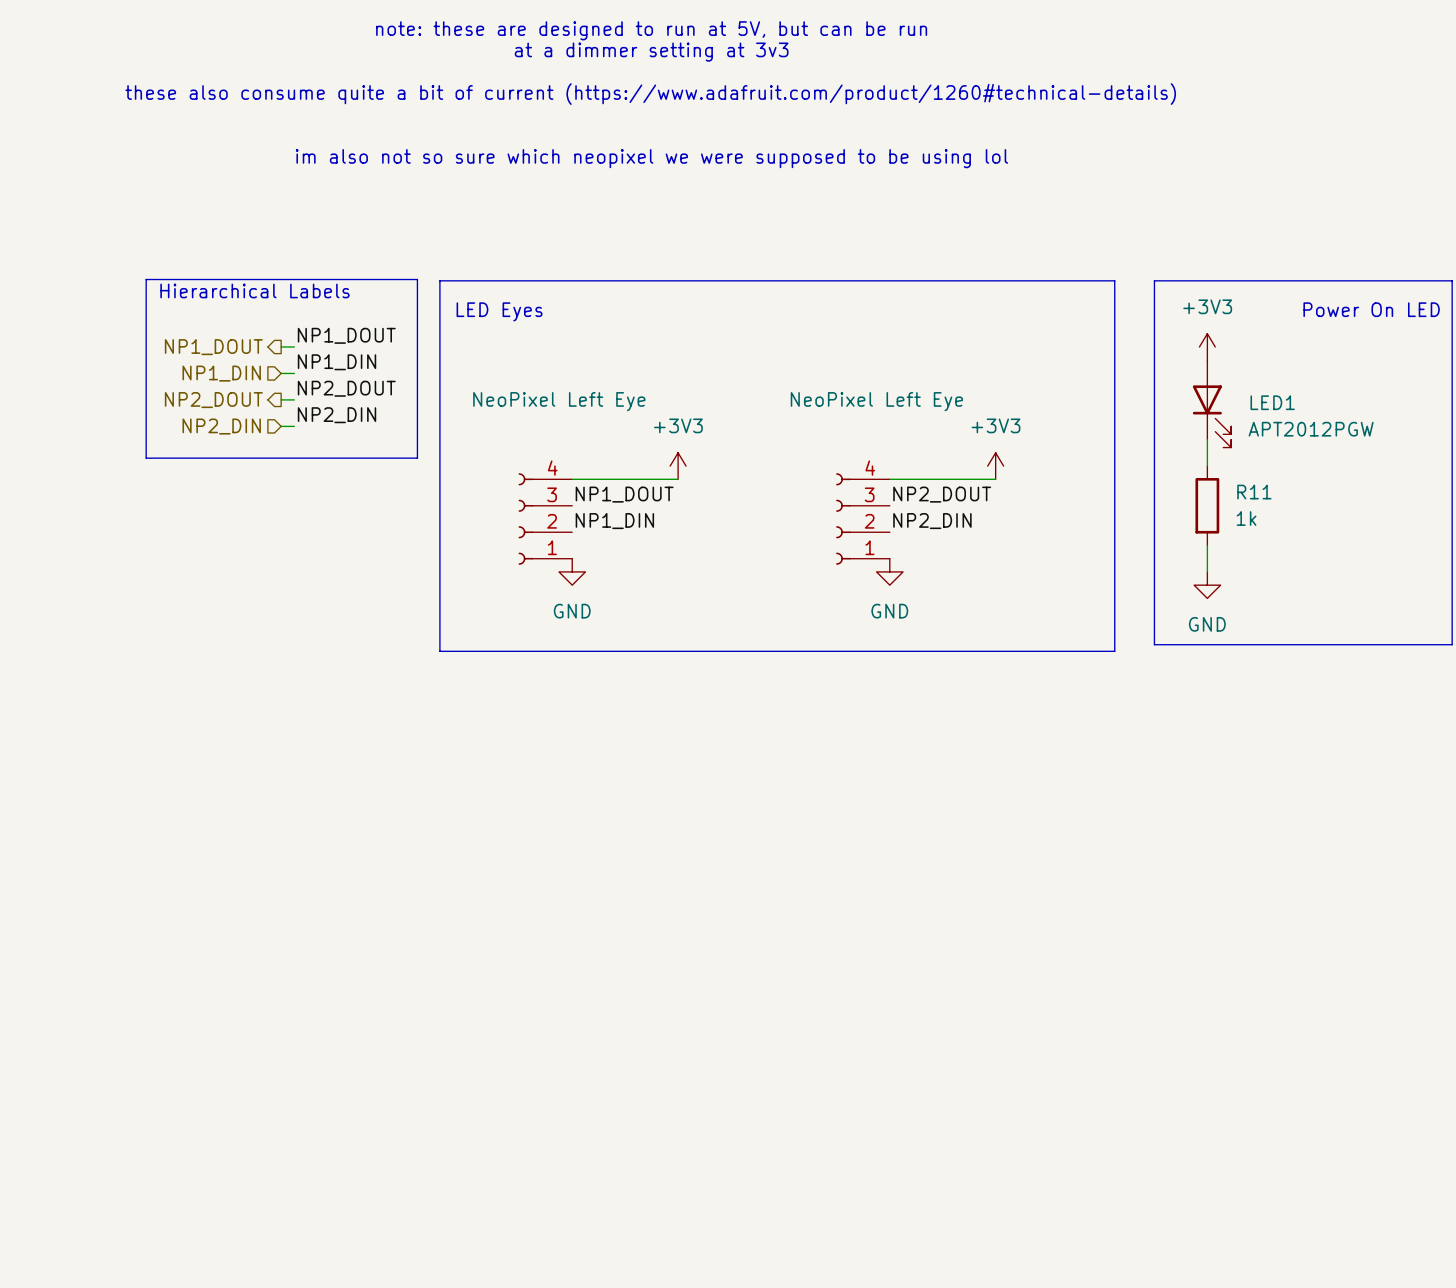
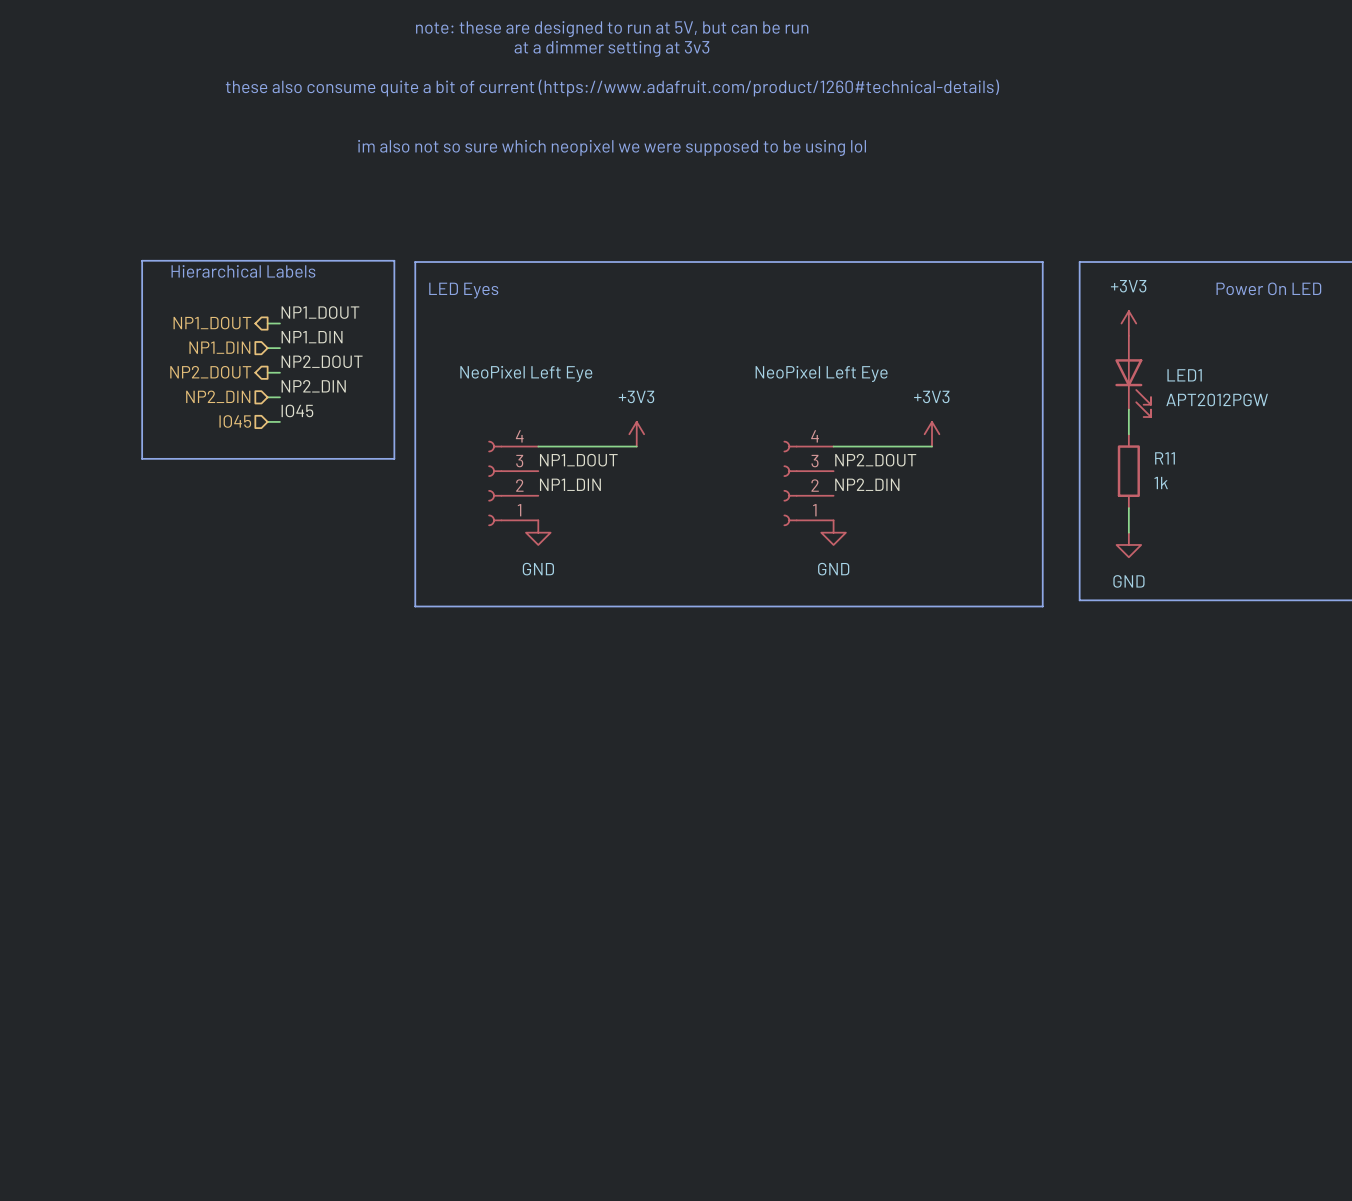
label: none -> IO45 (297, 410)
hierarchical label: none -> IO45 (235, 421)
wire: none -> (267, 421) (279, 421)
line: (146, 458) (417, 458) -> (142, 426) (142, 458) (394, 458) (394, 426)

